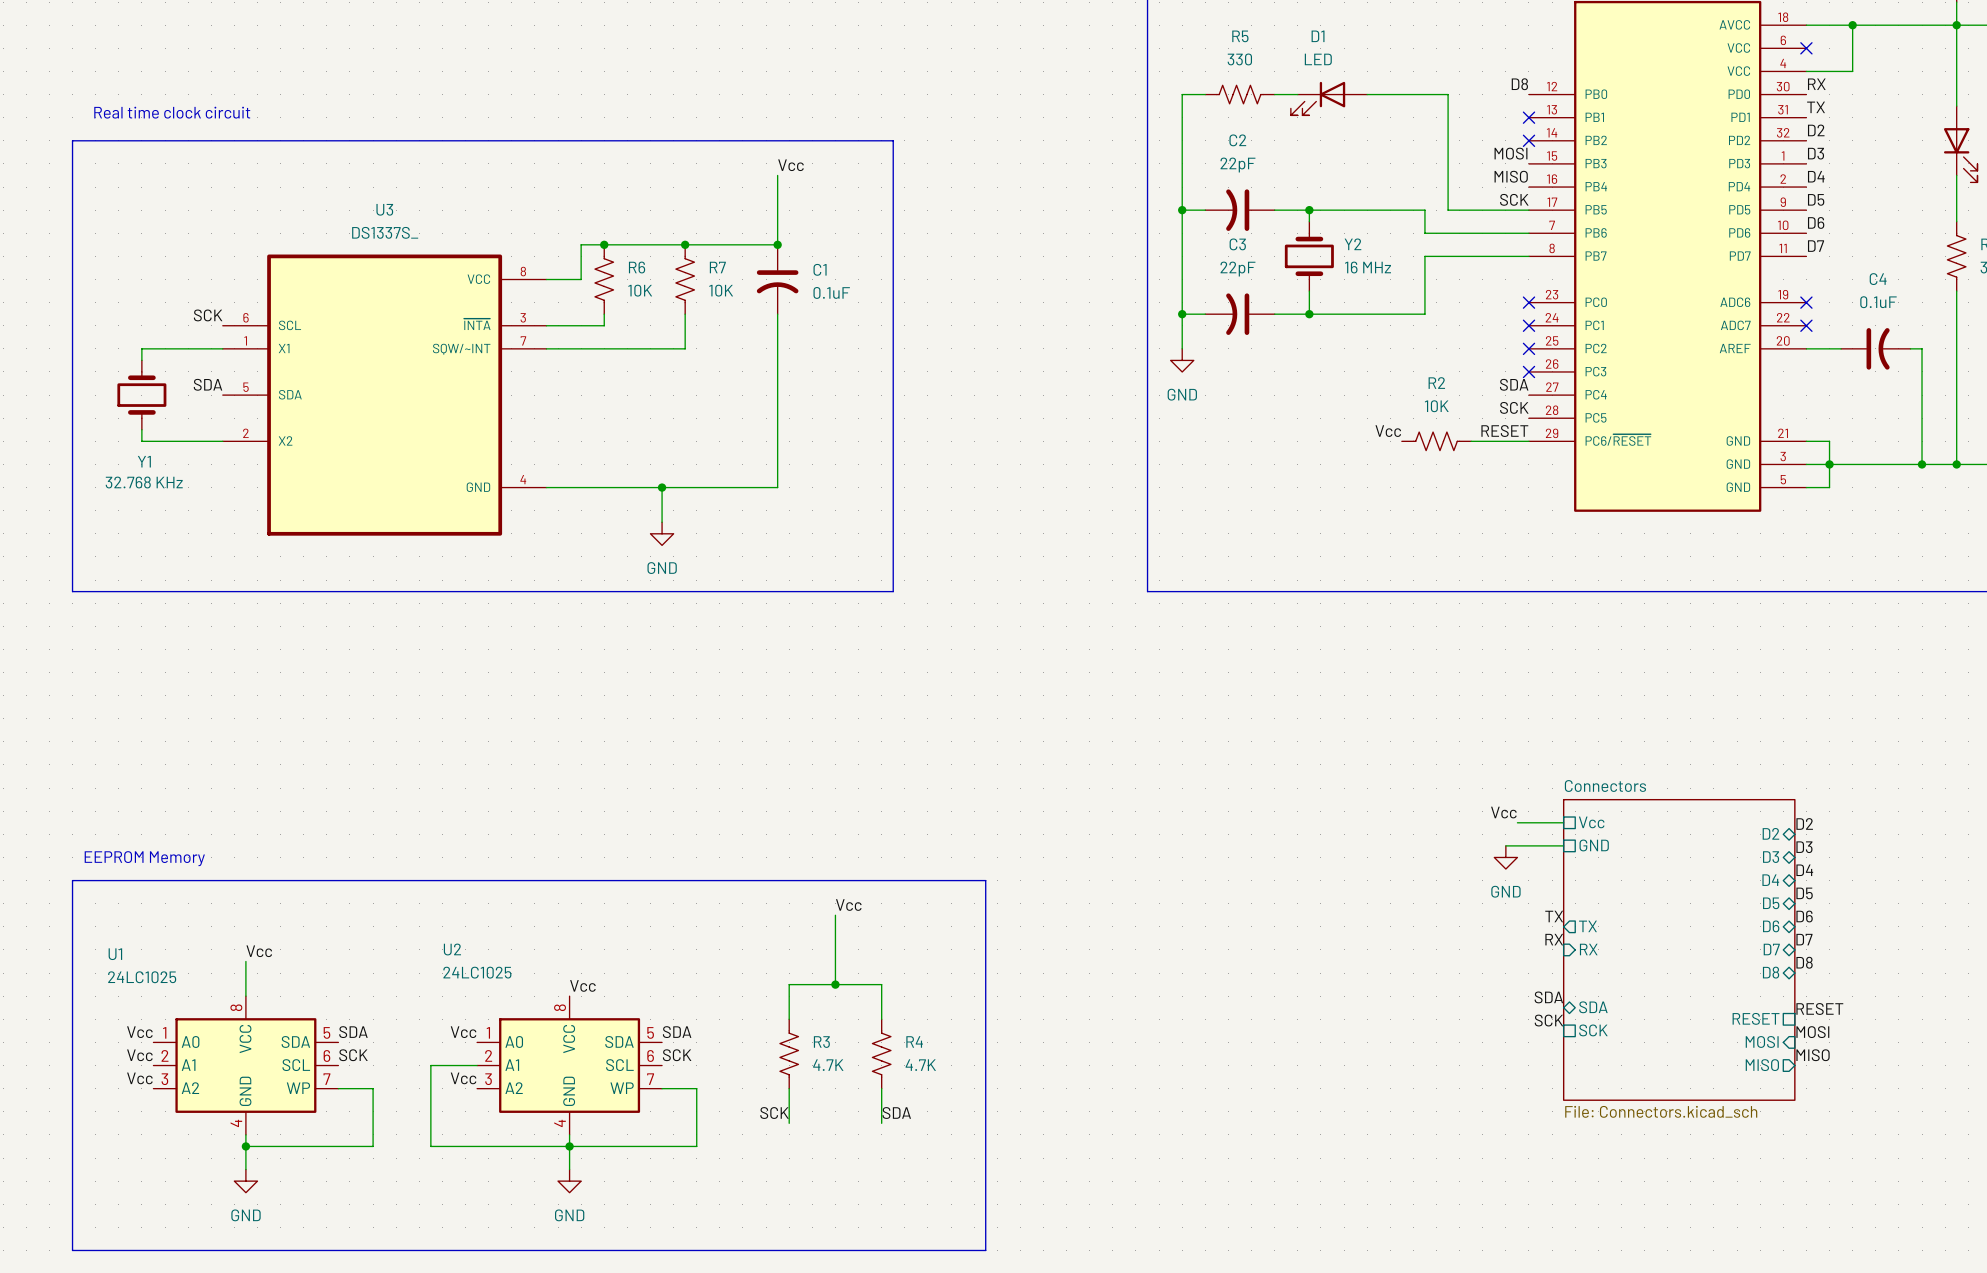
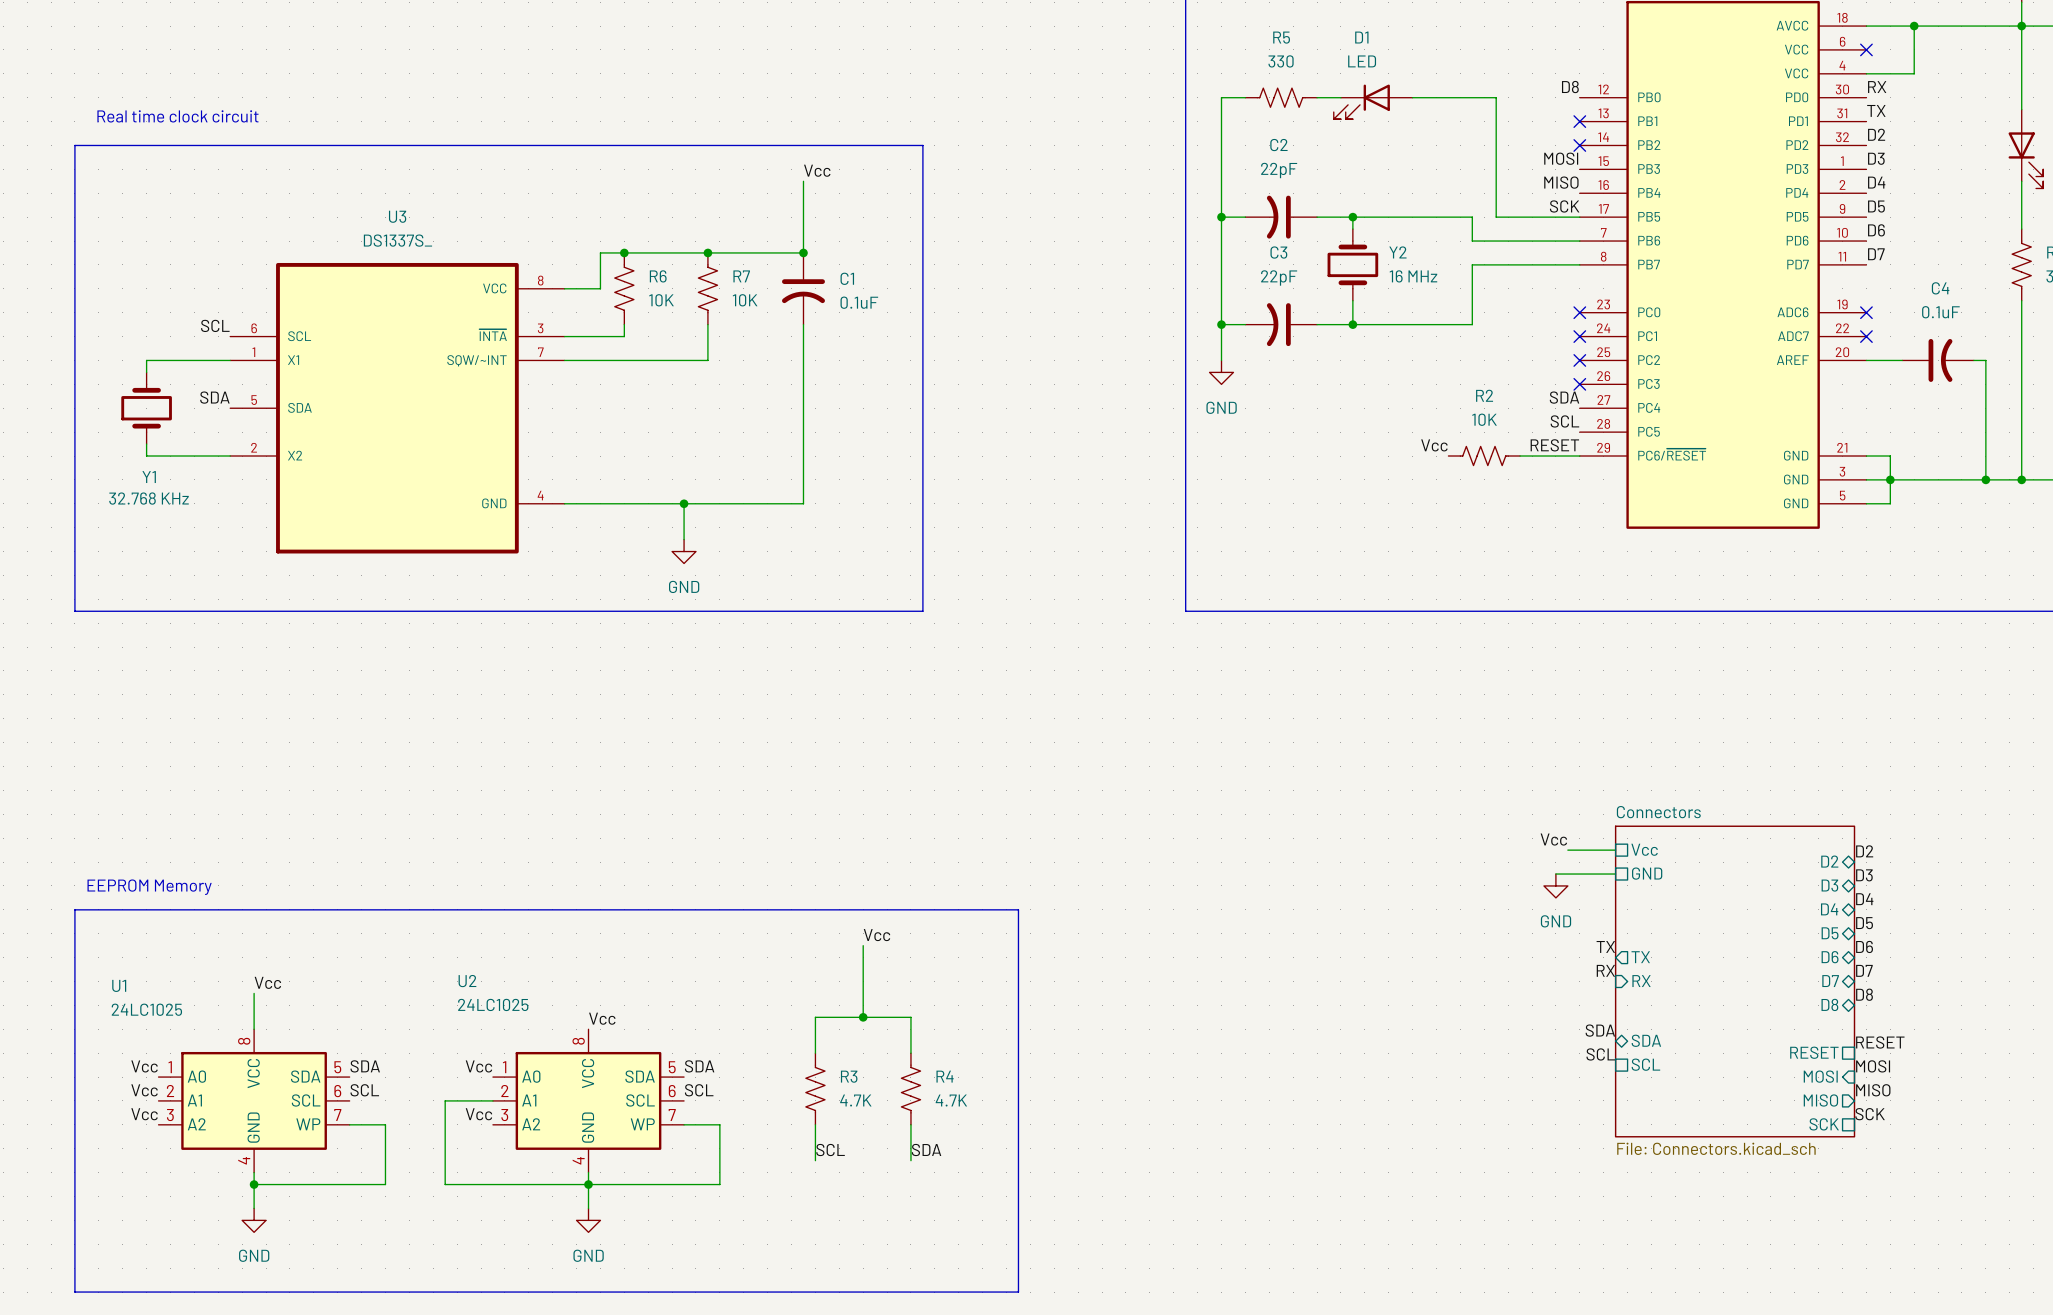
label: SCK (208, 315) -> SCL (215, 325)
label: SCK (1514, 407) -> SCL (1564, 421)
label: SCK (1548, 1020) -> SCL (1600, 1054)
sheet pin: SCK (1593, 1030) -> SCL (1645, 1064)
label: SCK (353, 1055) -> SCL (364, 1090)
label: SCK (677, 1055) -> SCL (699, 1090)
label: none -> SCK (1870, 1114)
sheet pin: none -> SCK (1824, 1124)
label: SCK (774, 1113) -> SCL (830, 1150)

